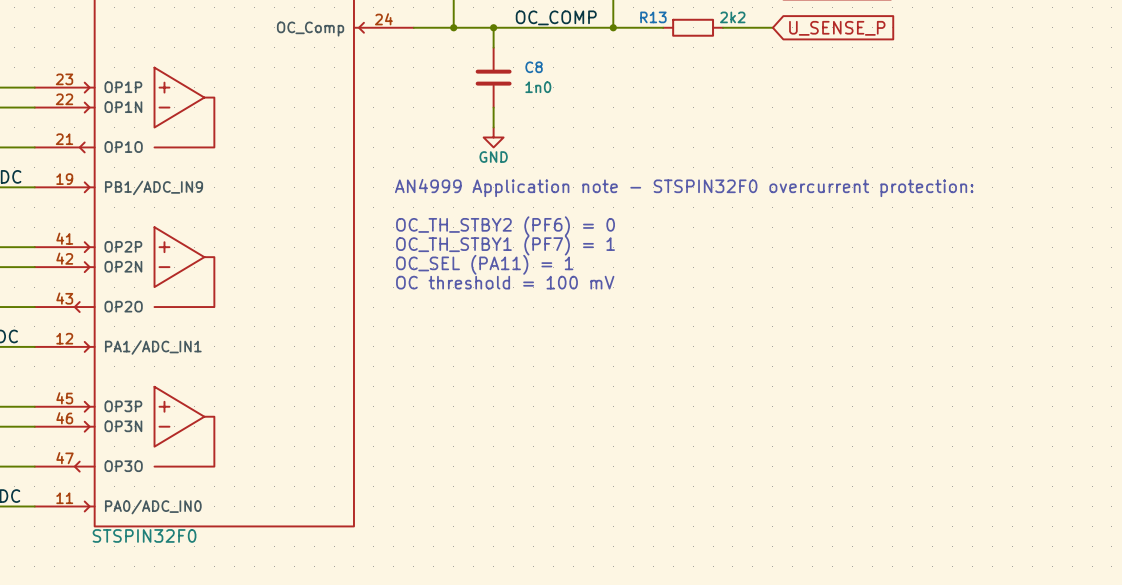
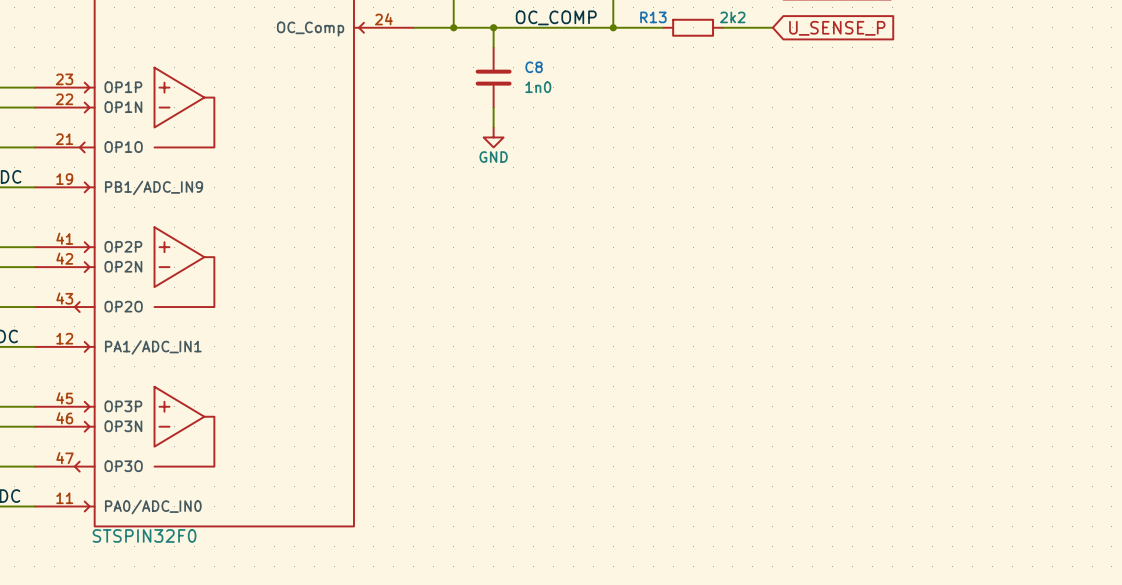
text: AN4999 Application note - STSPIN32F0 overcurrent protection: (684, 188) -> none
text: OC_TH_STBY2 (PF6) = 0 (505, 226) -> none
text: OC_TH_STBY1 (PF7) = 1 (505, 245) -> none
text: OC_SEL (PA11) = 1 (484, 264) -> none
text: OC threshold = 100 mV (505, 282) -> none

